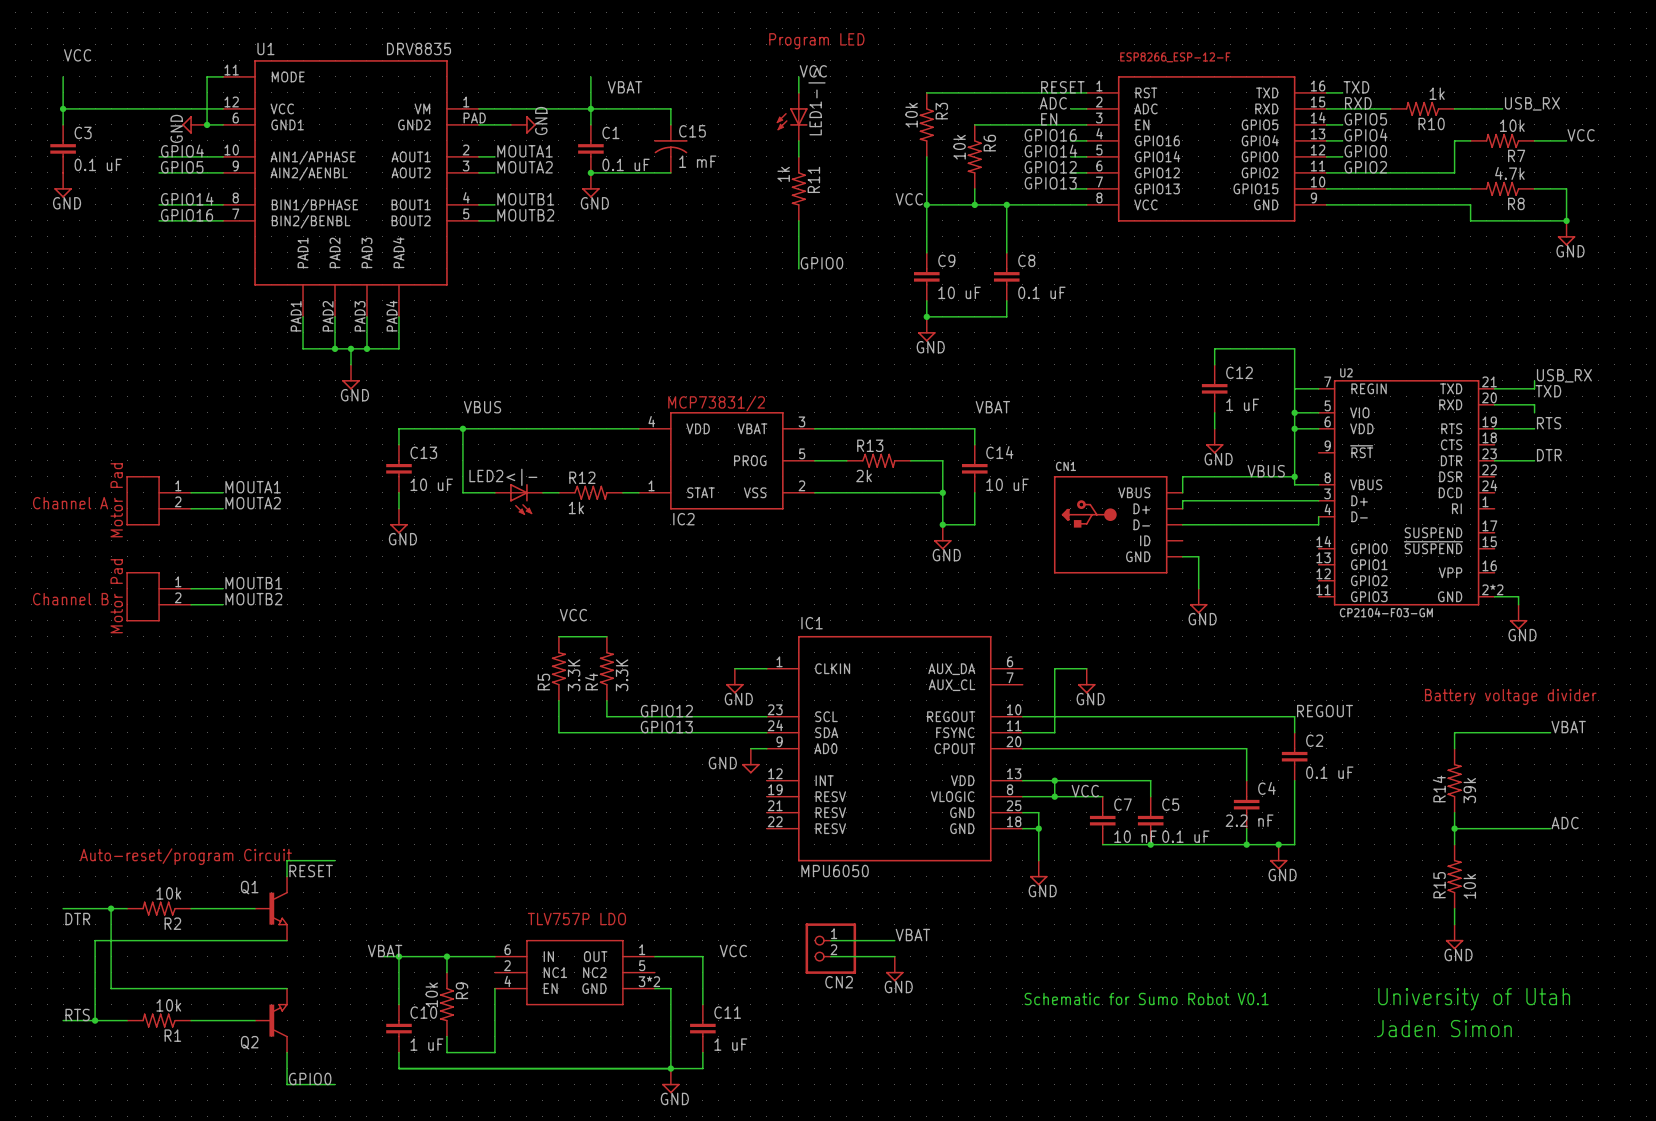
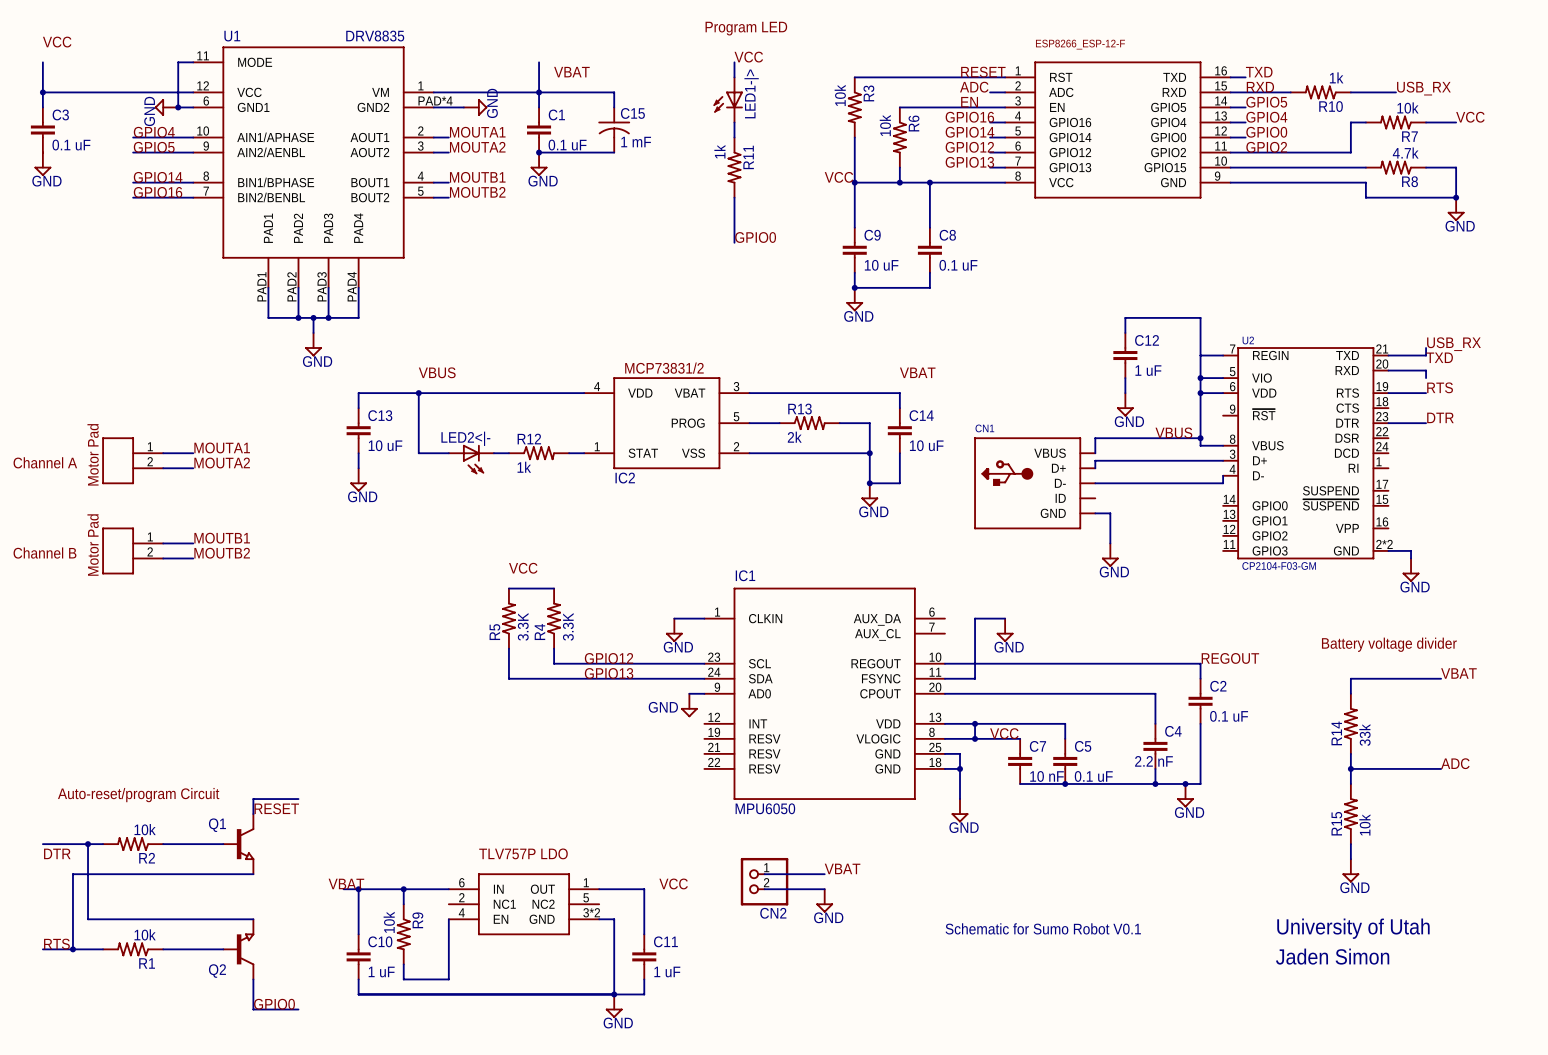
U1 pin number: PAD (474, 117) -> PAD*4 (435, 100)
R14 value: 39k (1469, 790) -> 33k (1364, 735)

